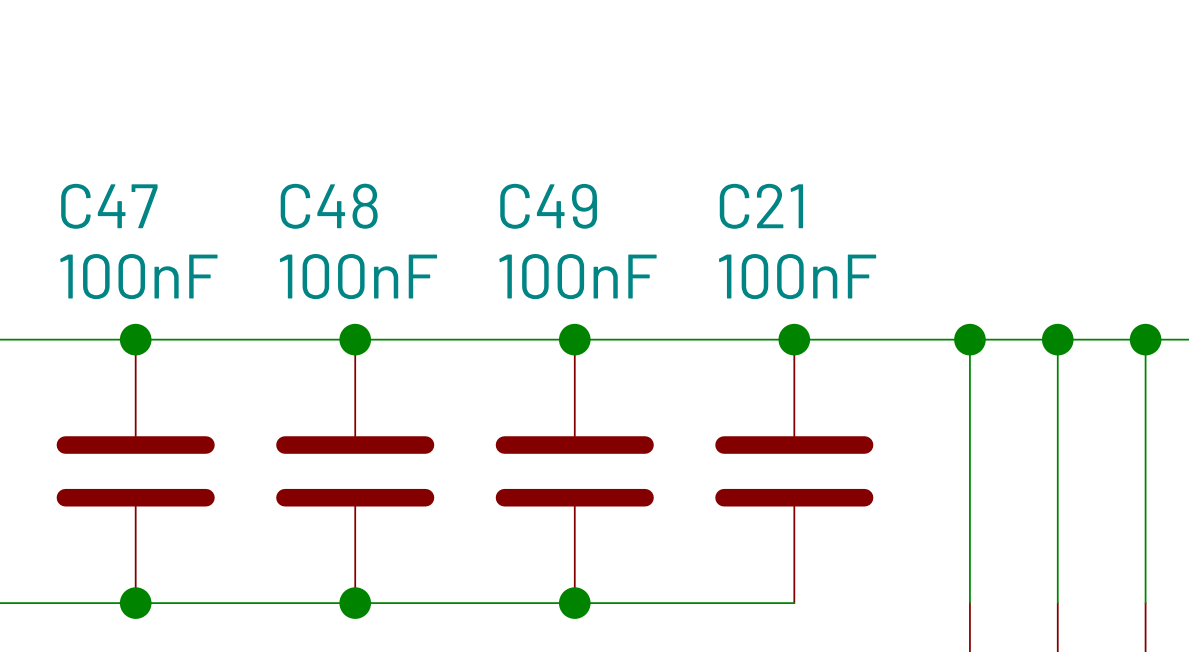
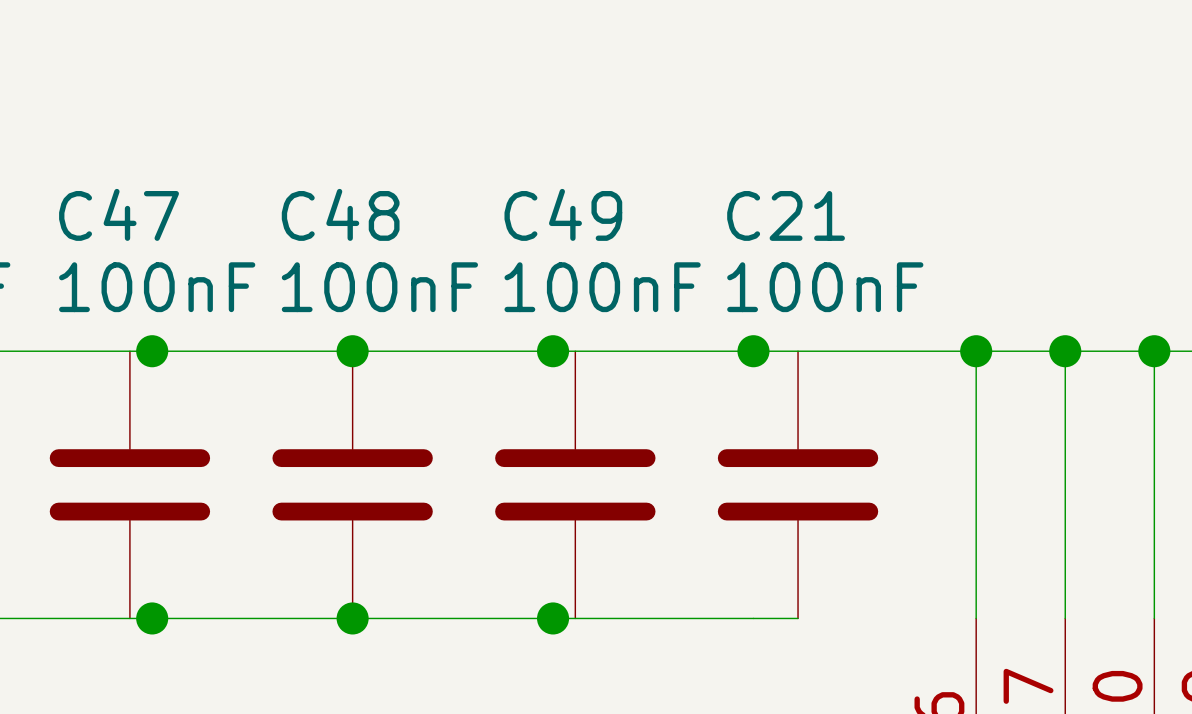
junction position: (135, 339) -> (152, 351)
junction position: (574, 339) -> (553, 351)
junction position: (794, 339) -> (753, 351)
junction position: (135, 603) -> (152, 618)
junction position: (574, 603) -> (553, 618)

